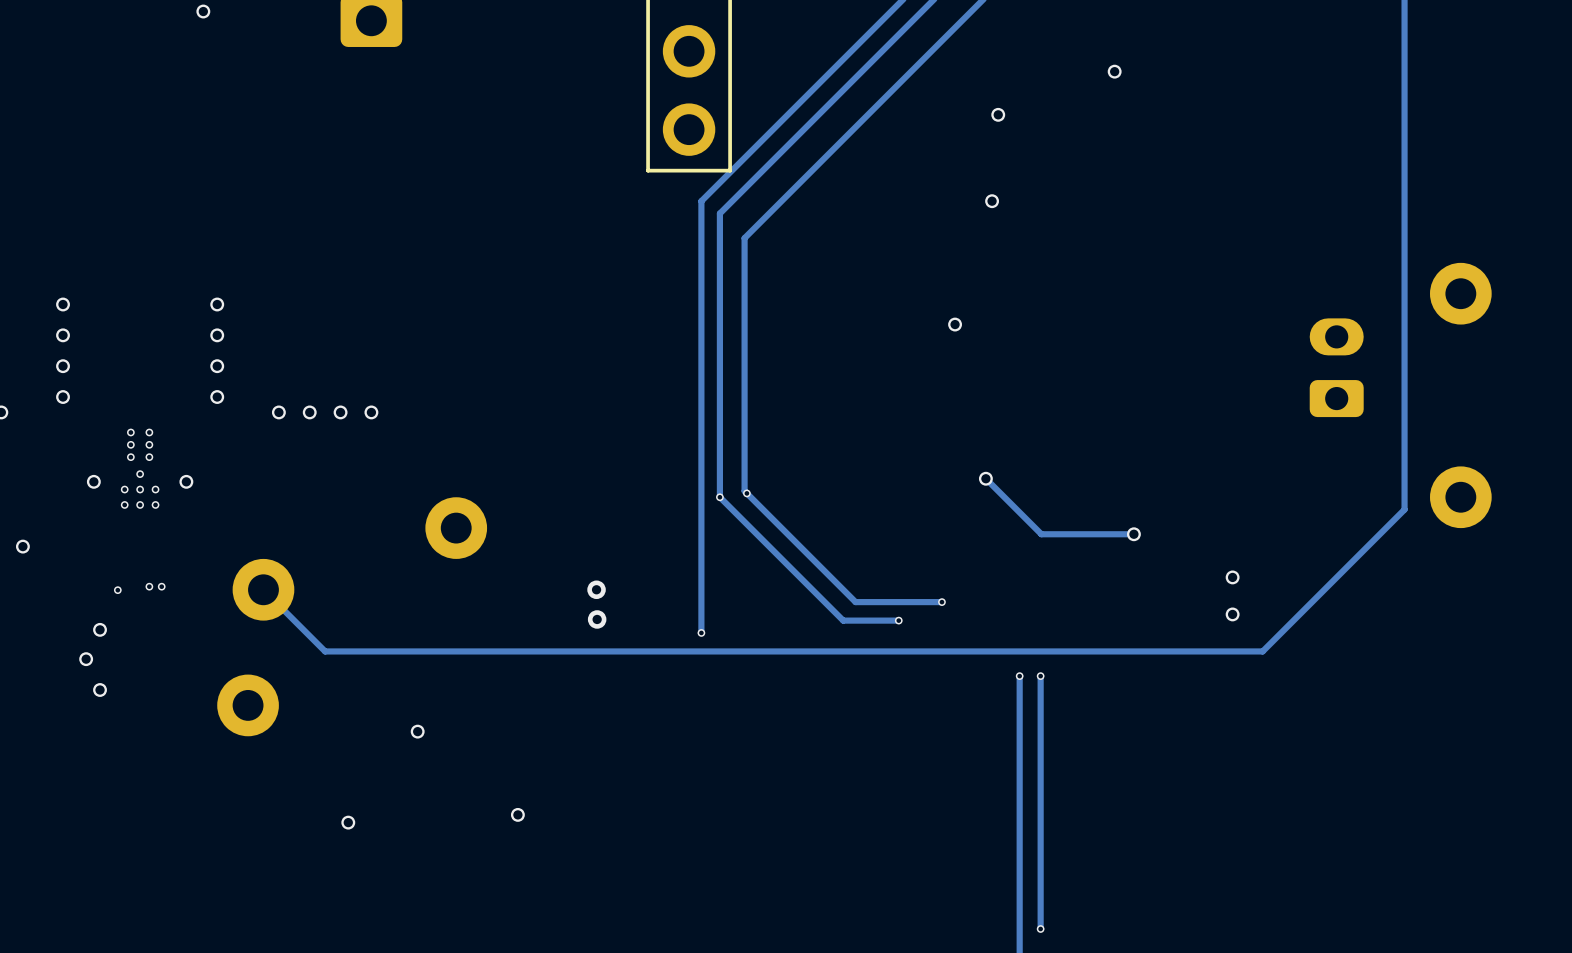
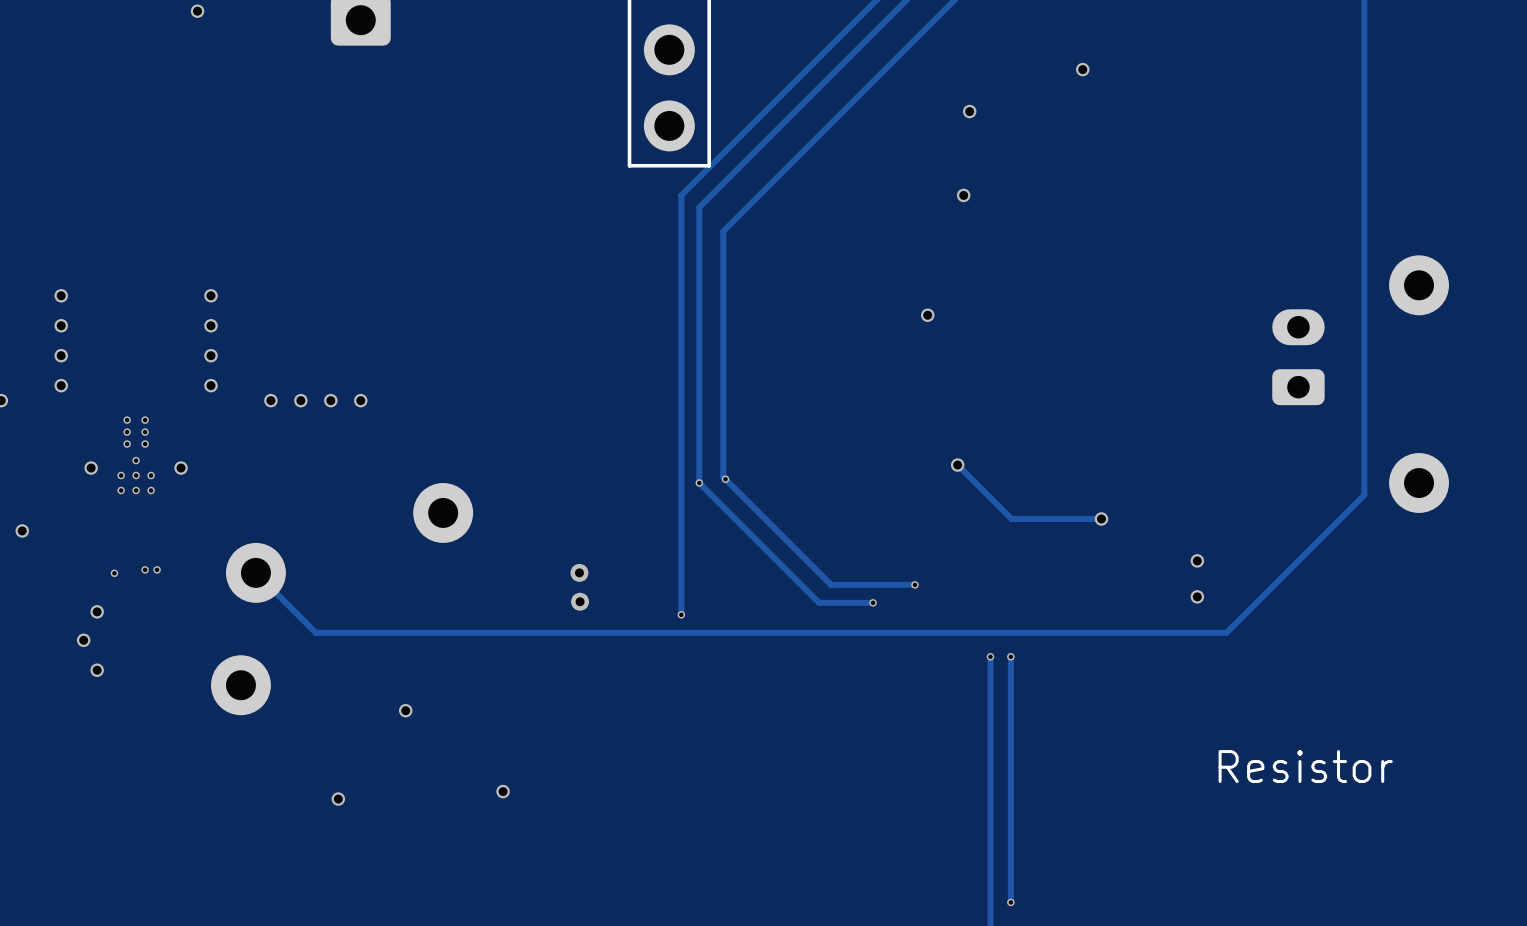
text: none -> Resistor (1305, 766)

